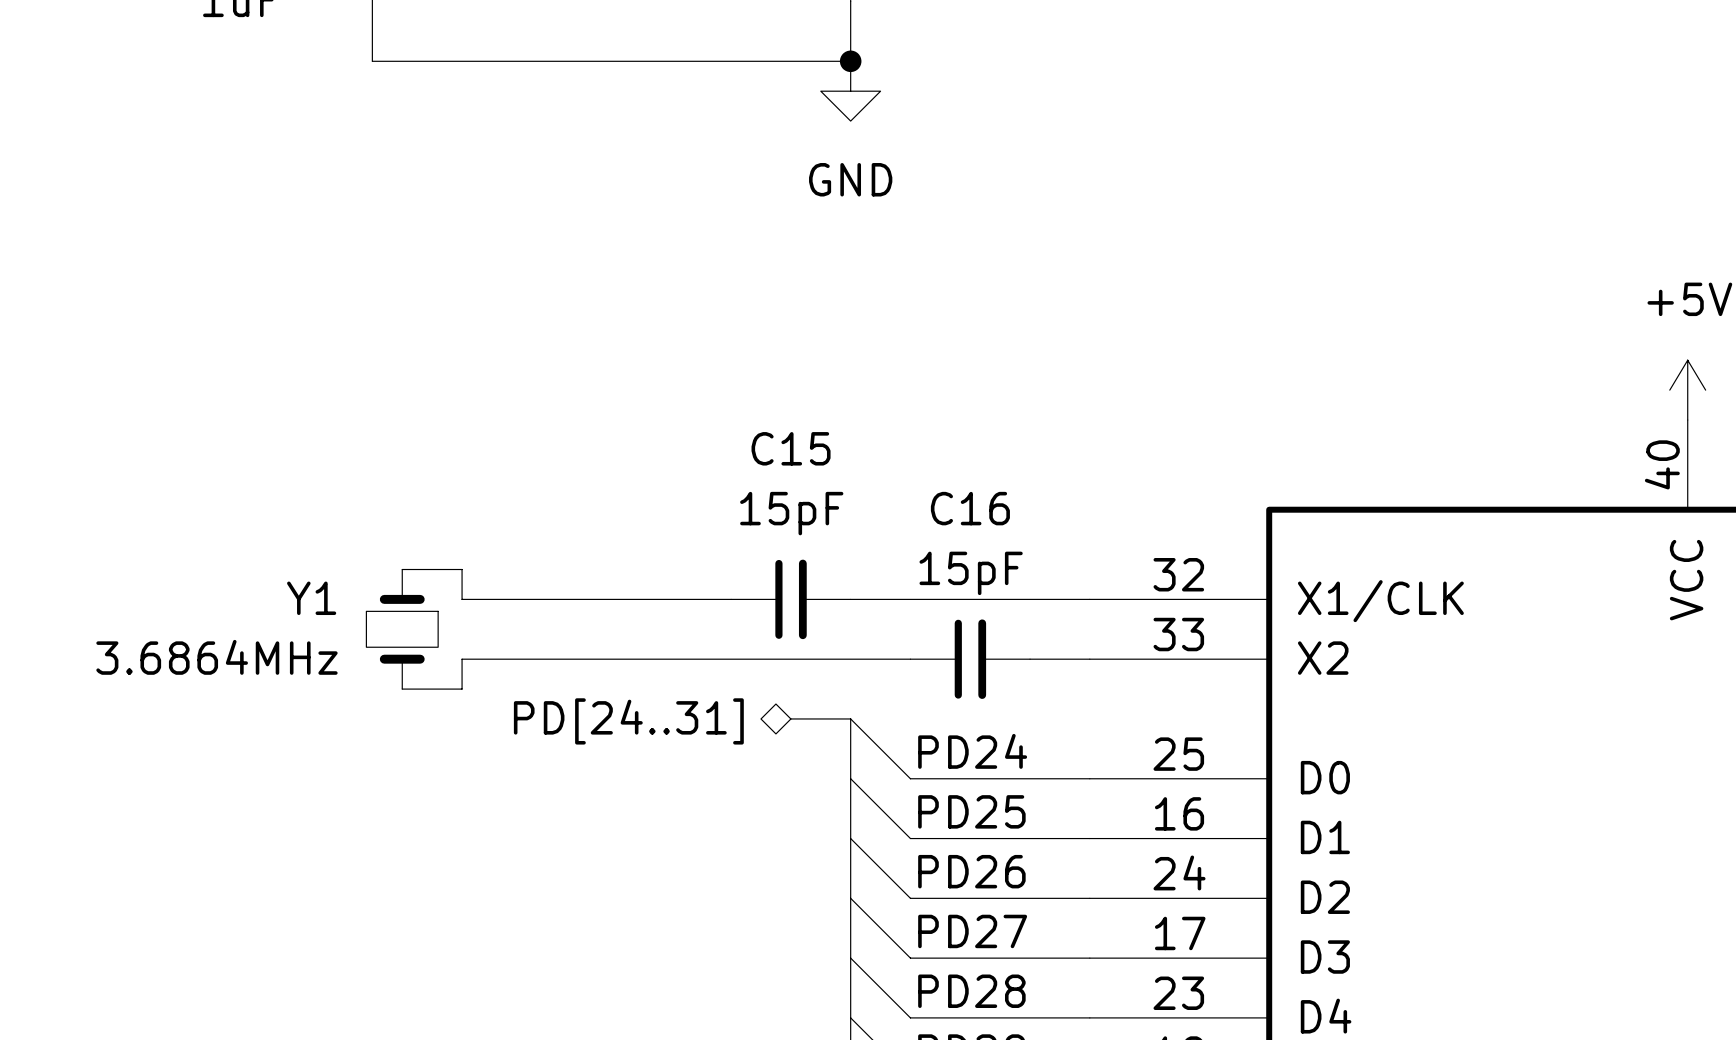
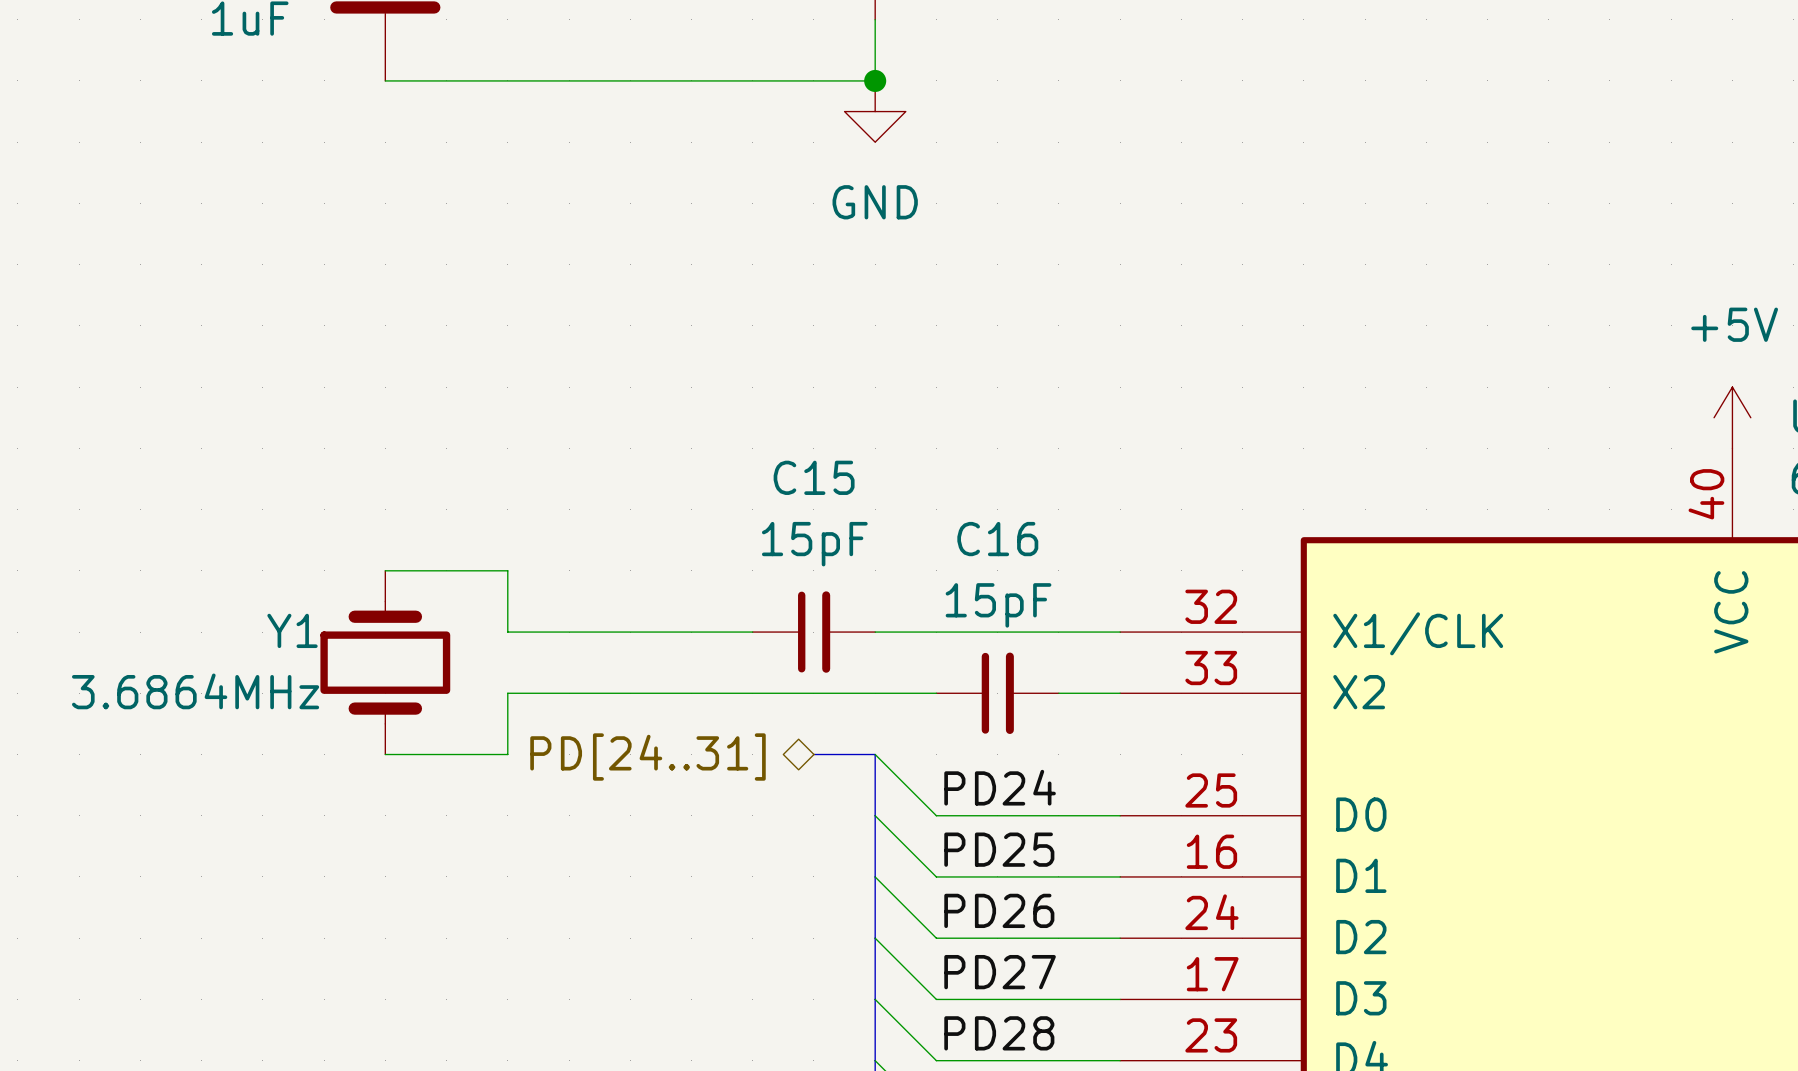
Y1 symbol: [366, 569, 439, 690] -> [320, 570, 451, 755]
wire: (402, 569) (462, 569) (462, 599) (491, 599) -> (385, 570) (507, 570) (507, 632)
wire: (491, 659) (462, 659) (462, 689) (402, 689) -> (507, 693) (507, 754) (385, 754)

